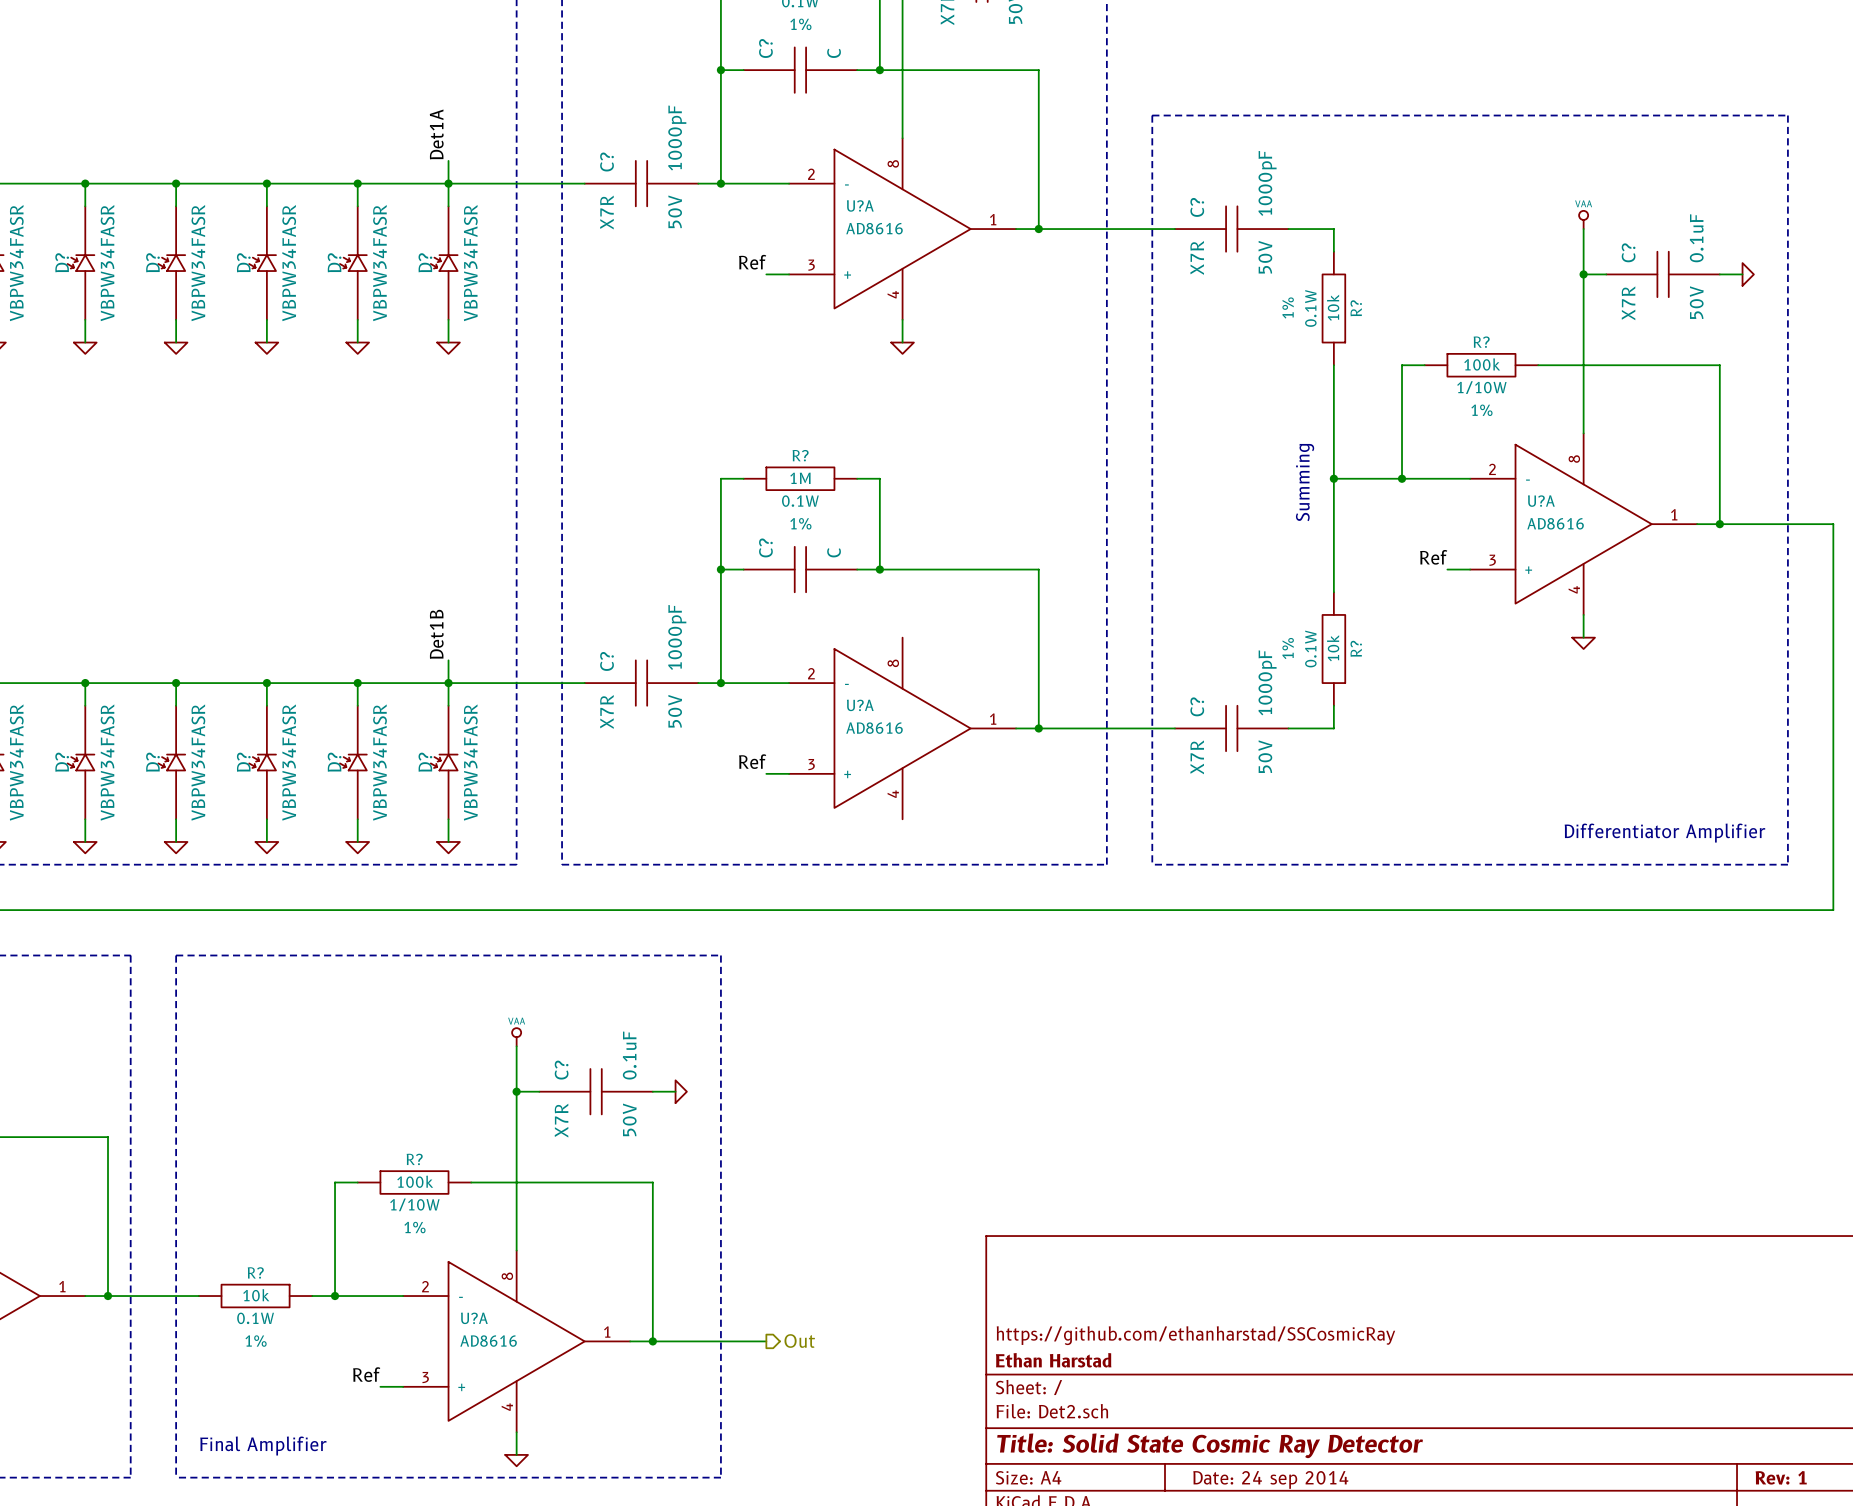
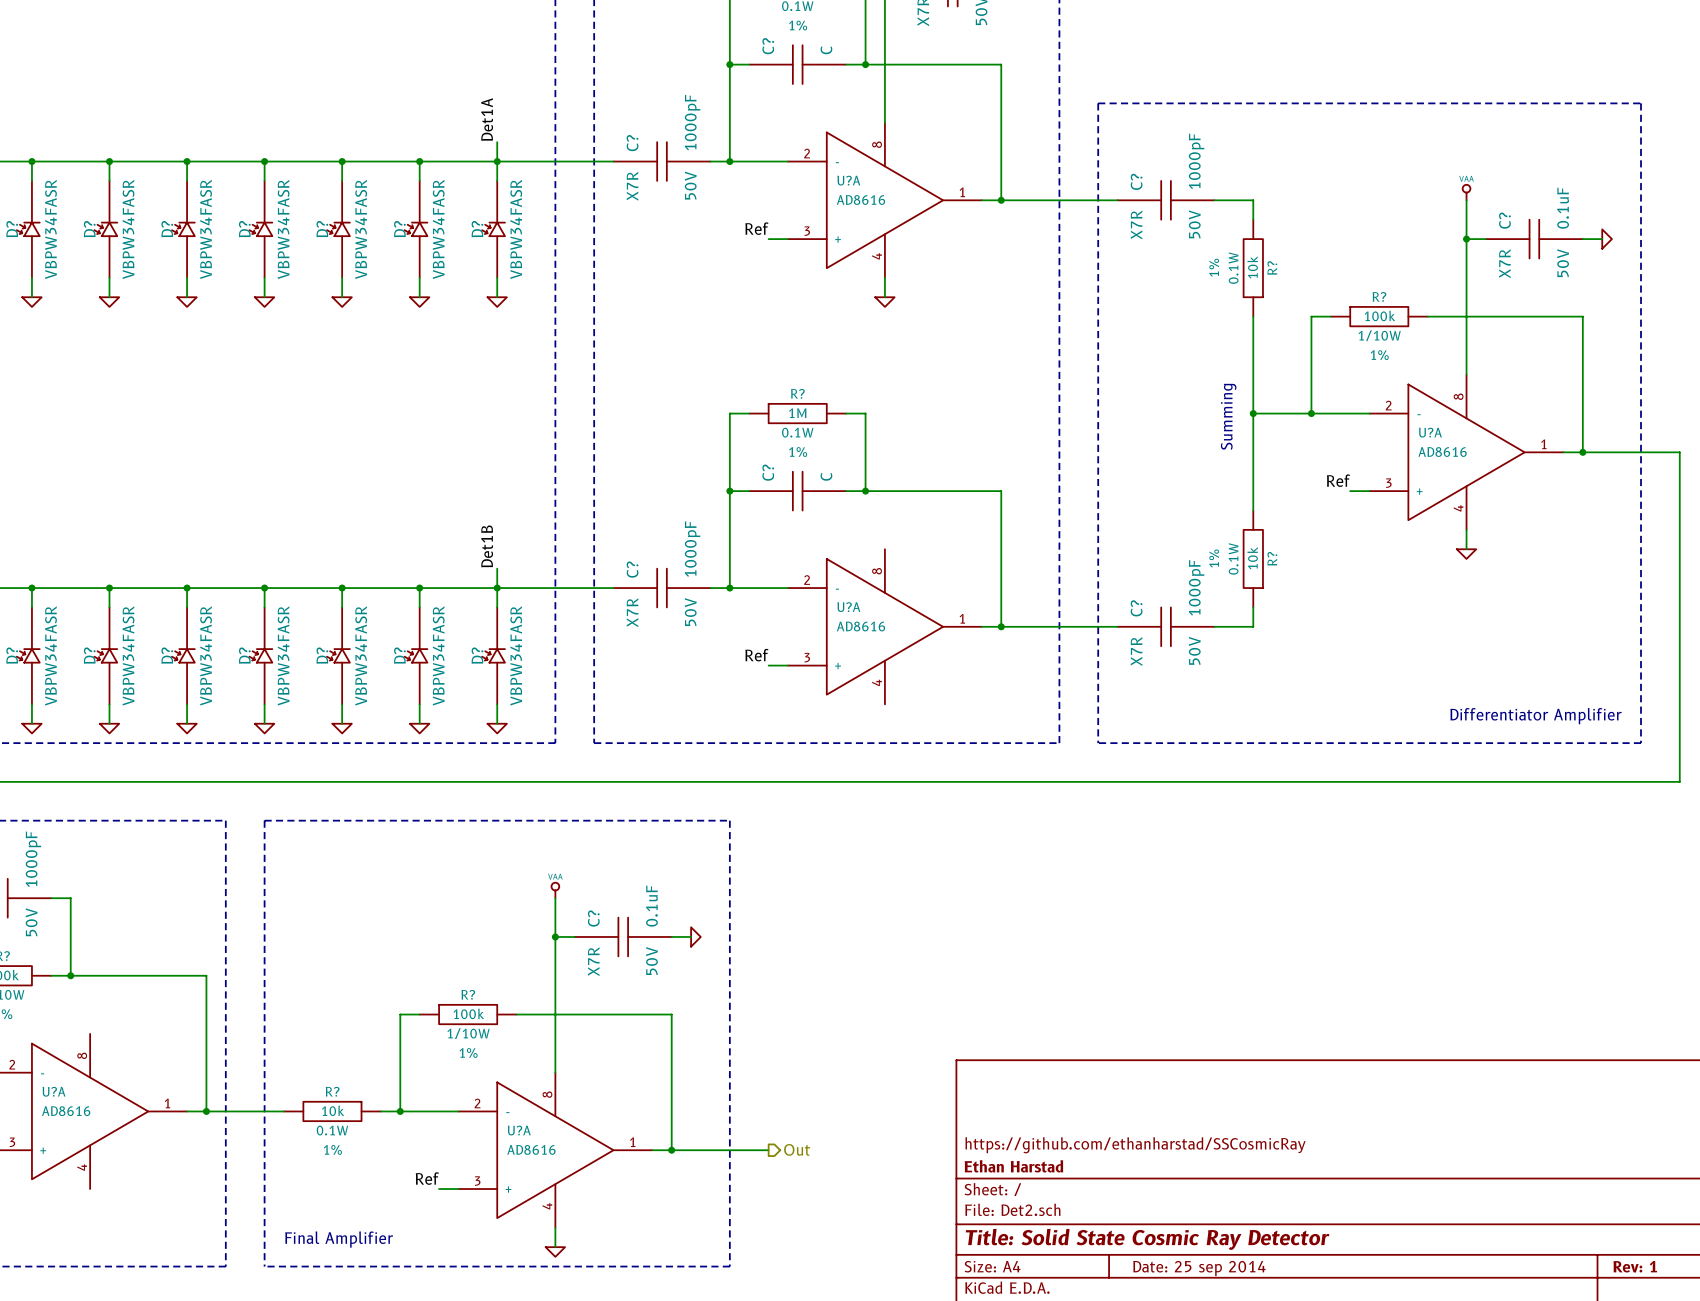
title block: Date: 24 sep 2014 (1270, 1479) -> Date: 25 sep 2014 (1199, 1268)

